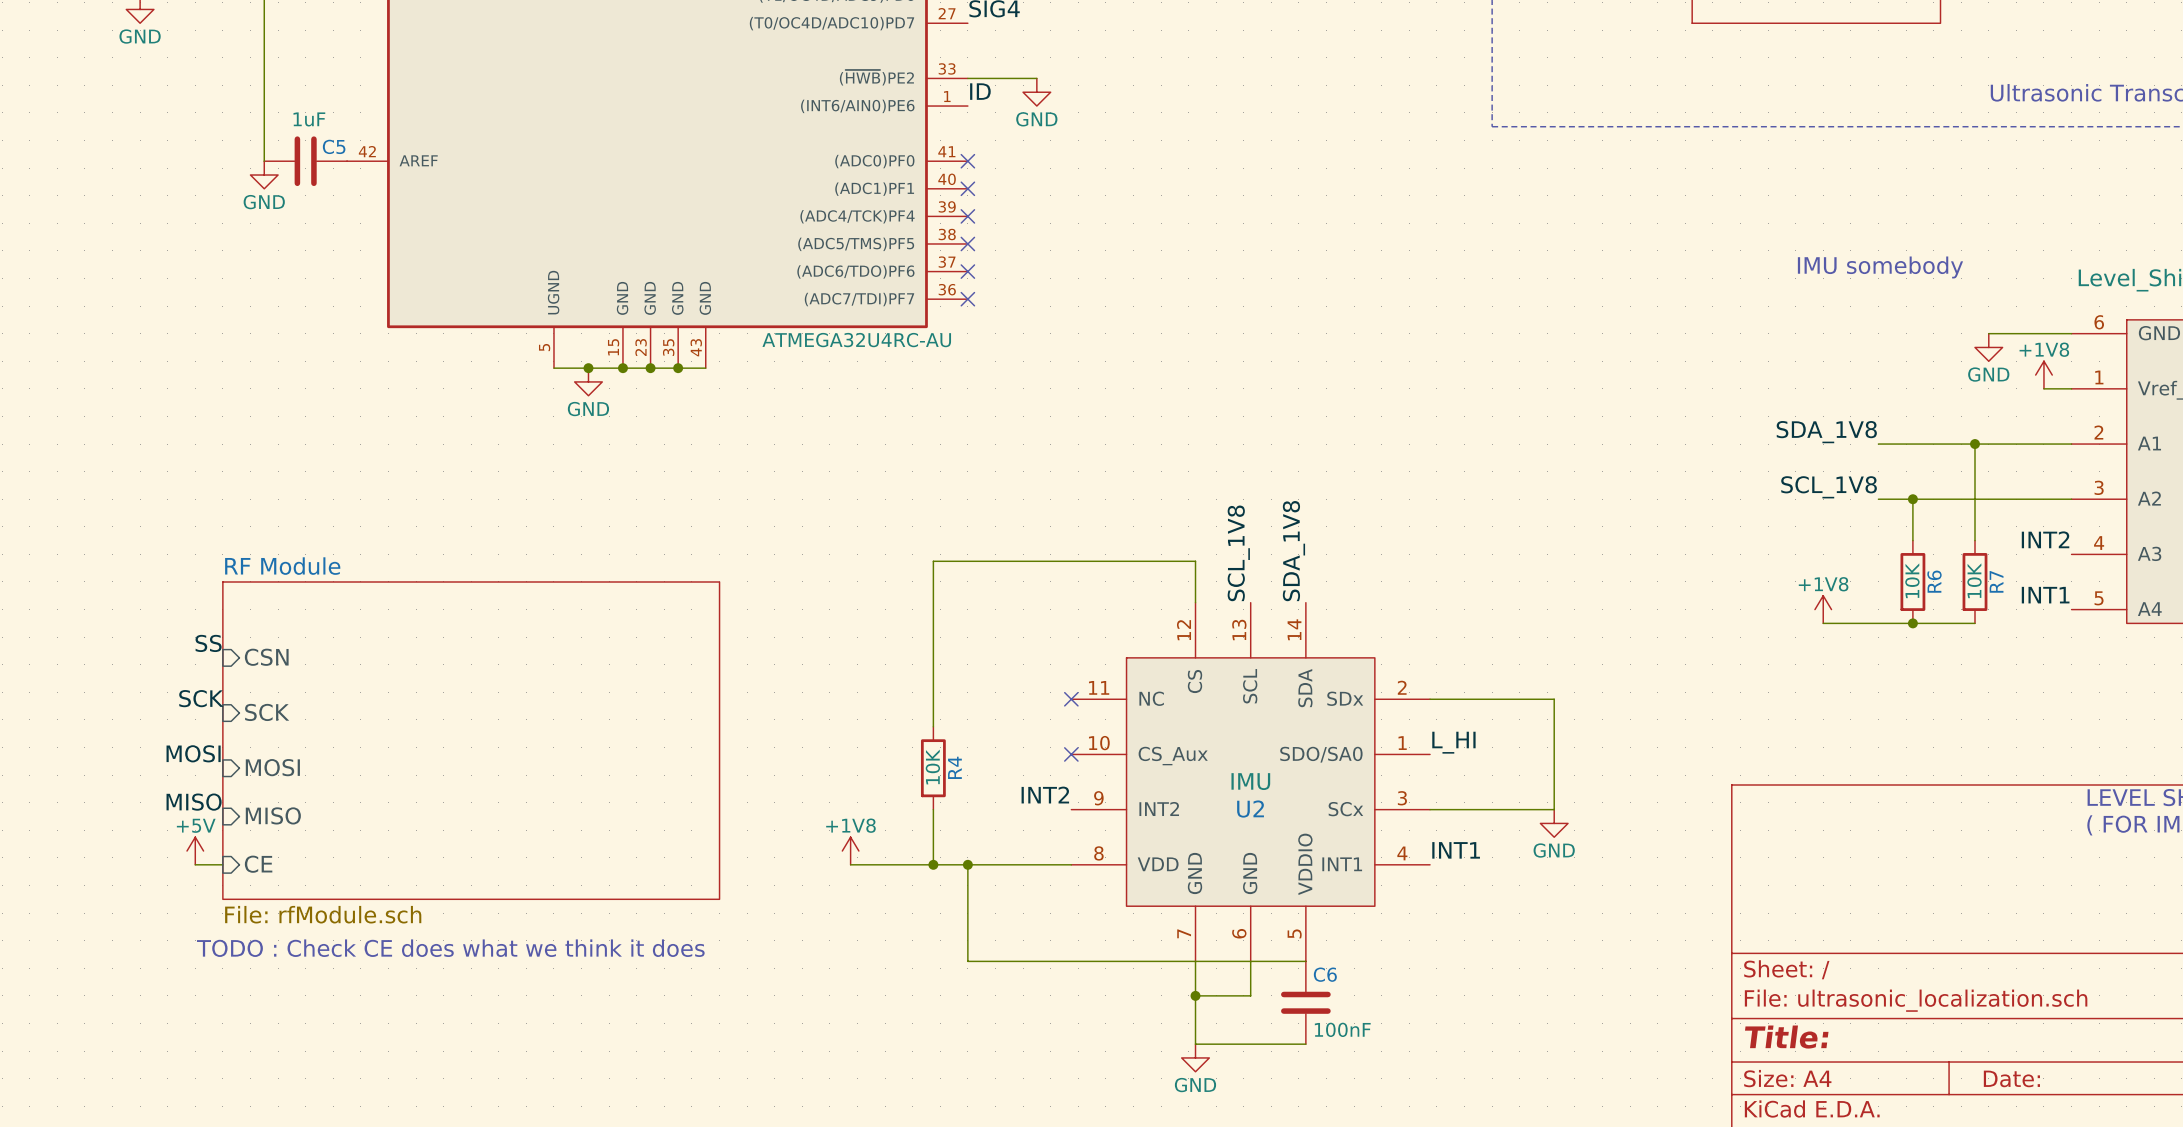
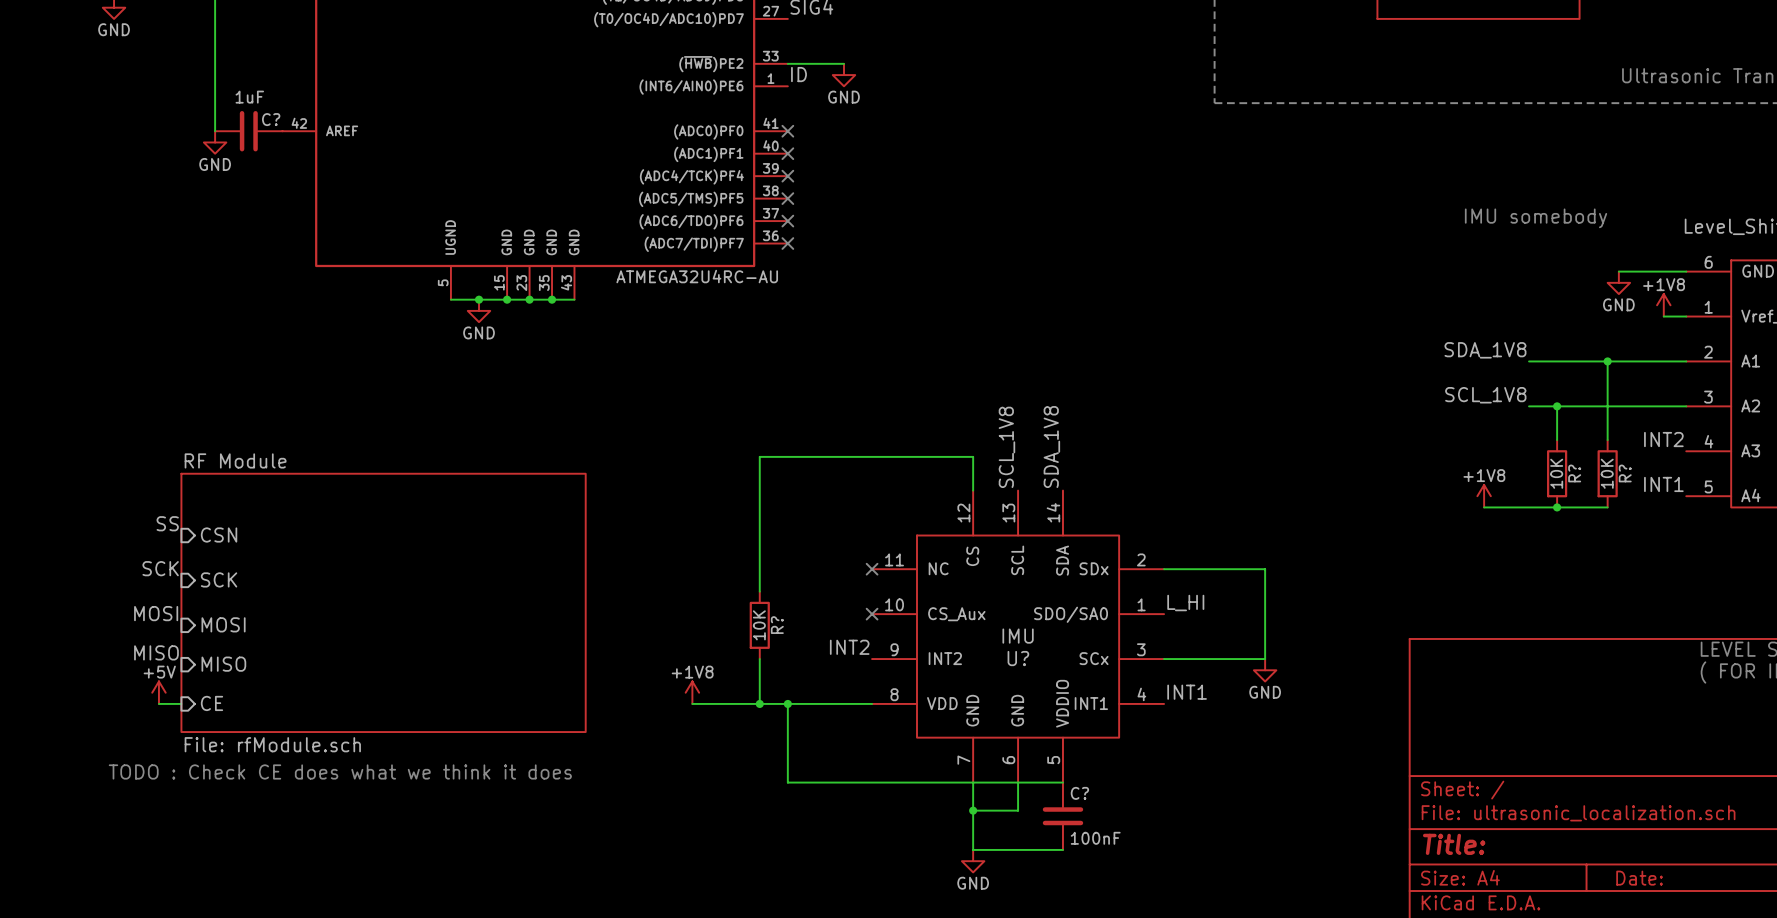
C5 name: C5 (334, 146) -> C? (271, 119)
R6 name: R6 (1934, 581) -> R? (1574, 473)
R7 name: R7 (1996, 581) -> R? (1625, 473)
R4 name: R4 (954, 767) -> R? (777, 625)
U2 name: U2 (1250, 809) -> U? (1018, 658)
C6 name: C6 (1325, 974) -> C? (1079, 793)

